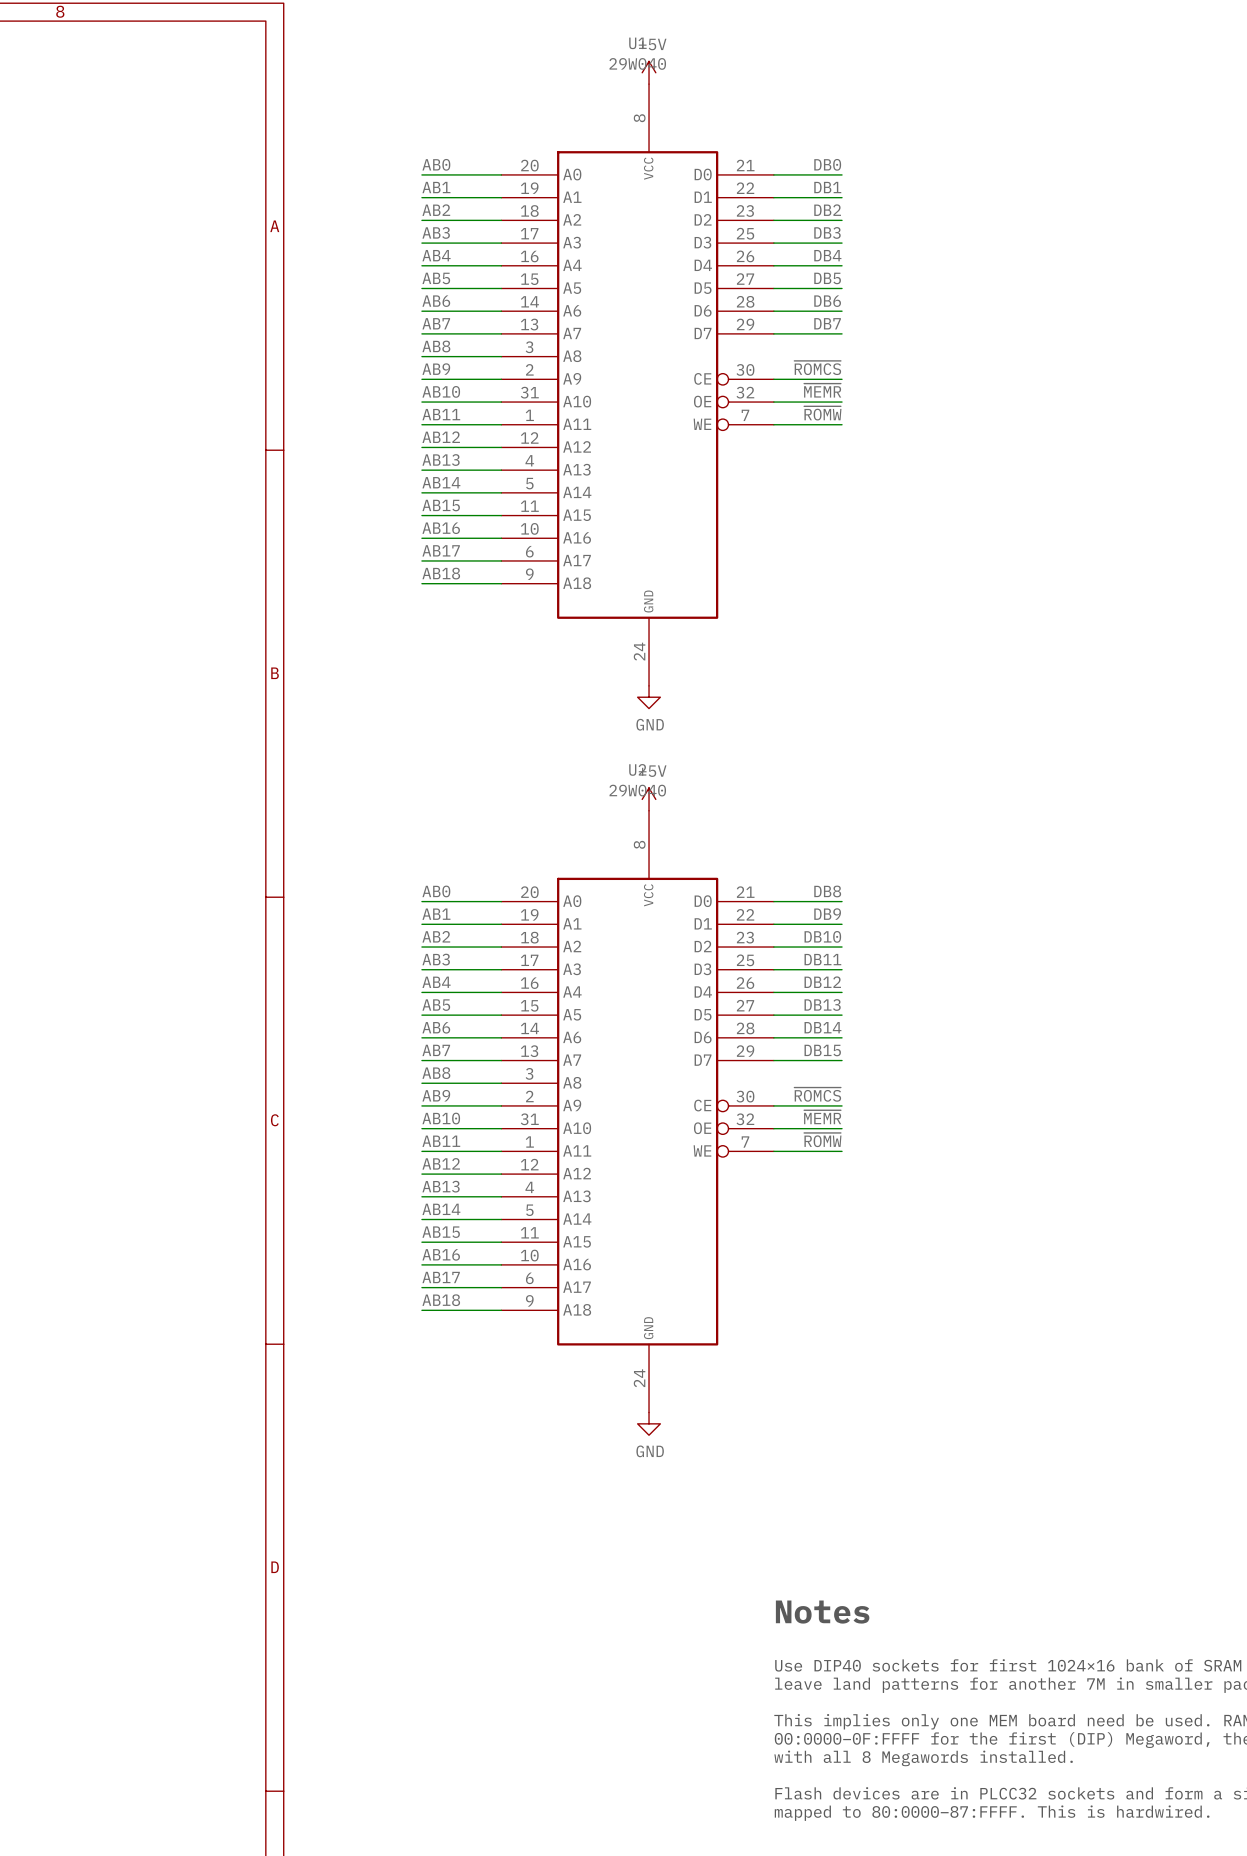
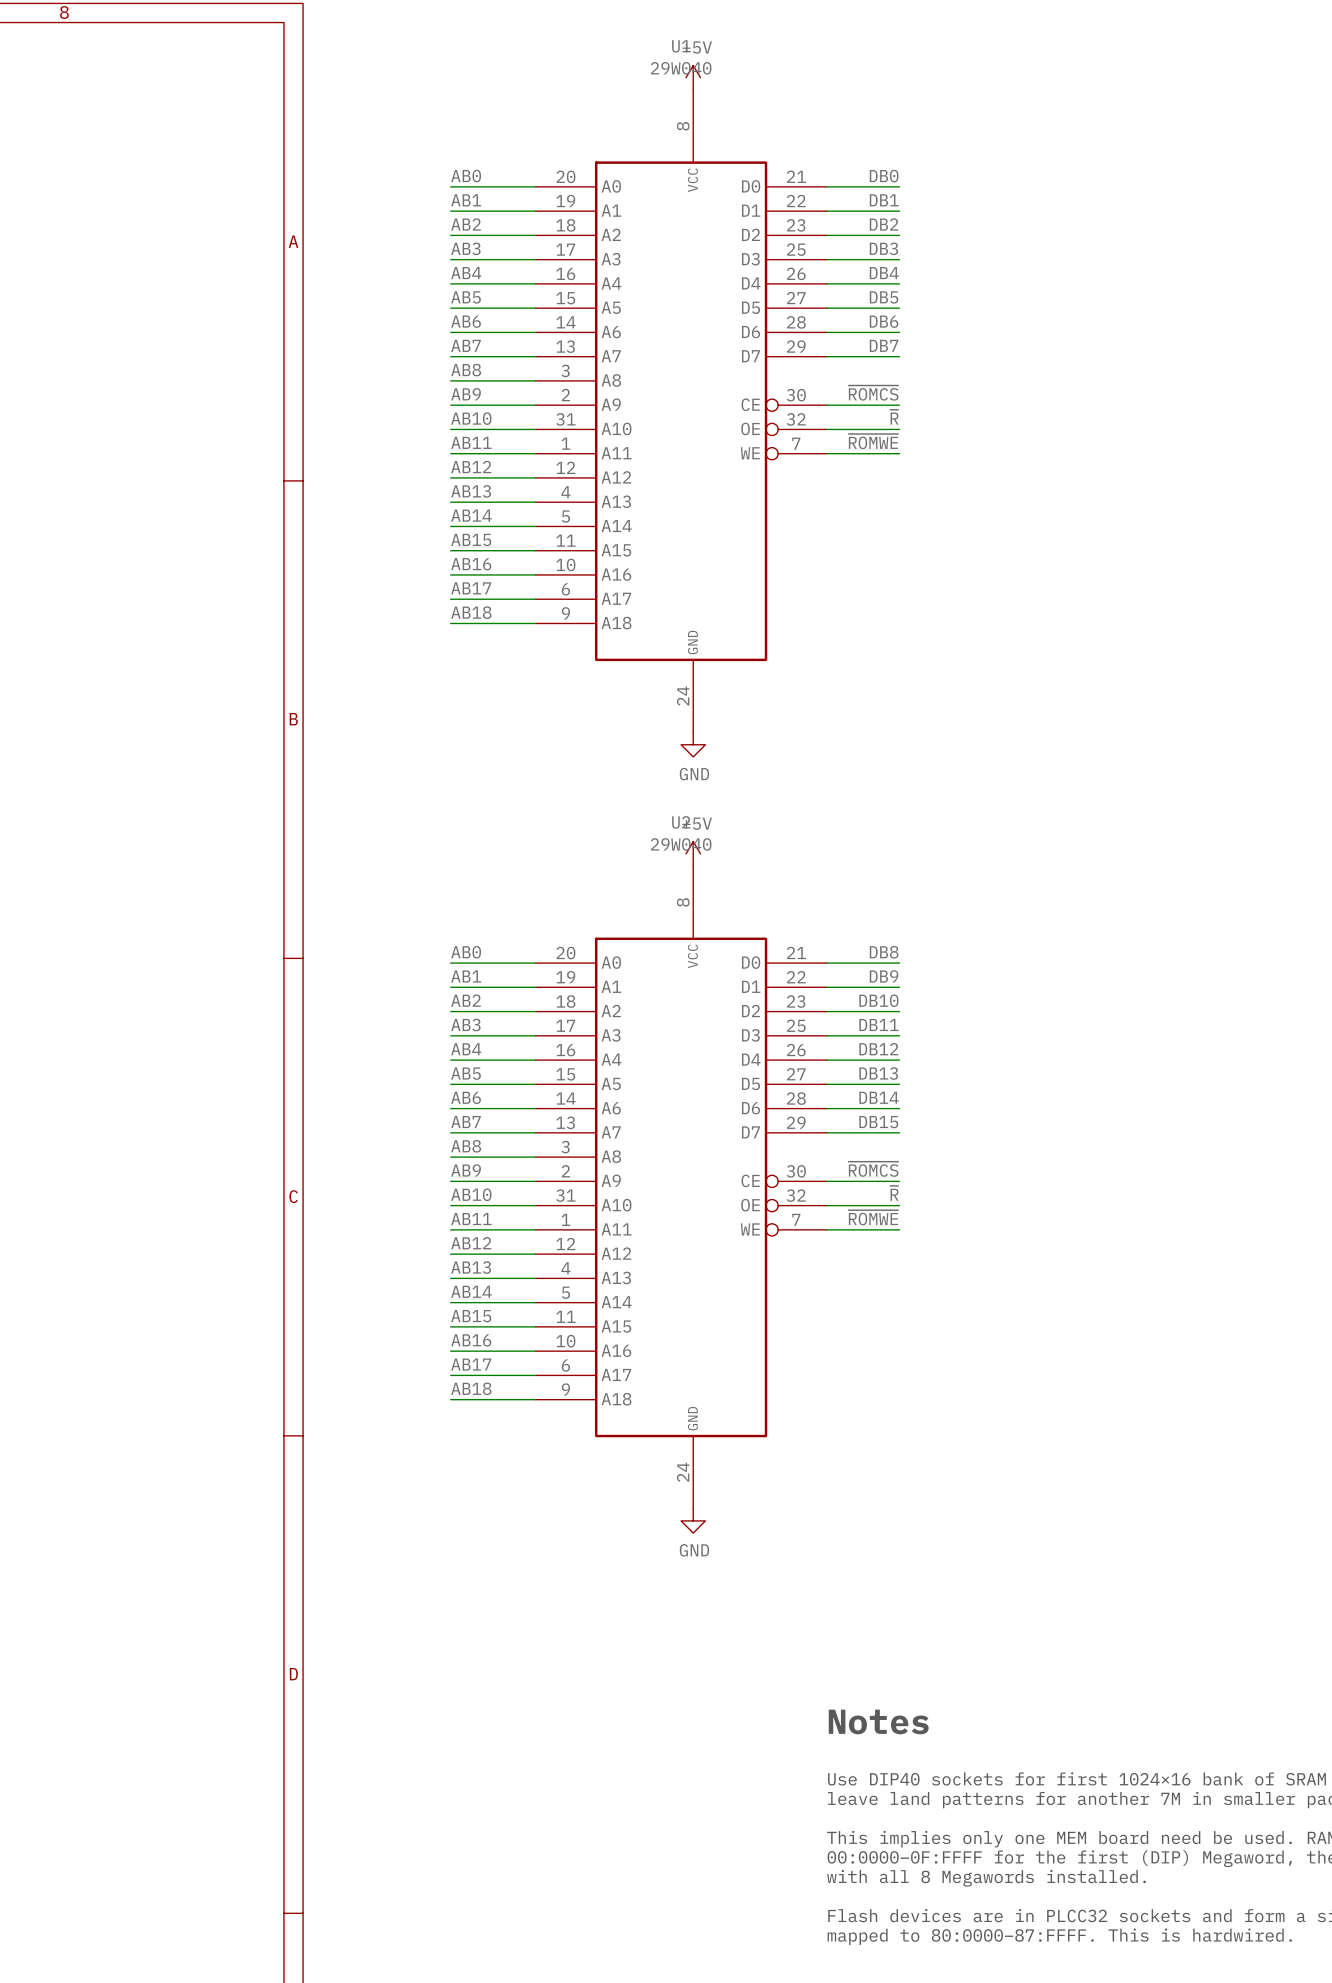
label: ~{MEMR} (822, 390) -> ~{R} (894, 417)
label: ~{ROMW} (822, 413) -> ~{ROMWE} (873, 441)
label: ~{MEMR} (822, 1117) -> ~{R} (894, 1193)
label: ~{ROMW} (822, 1140) -> ~{ROMWE} (873, 1217)

